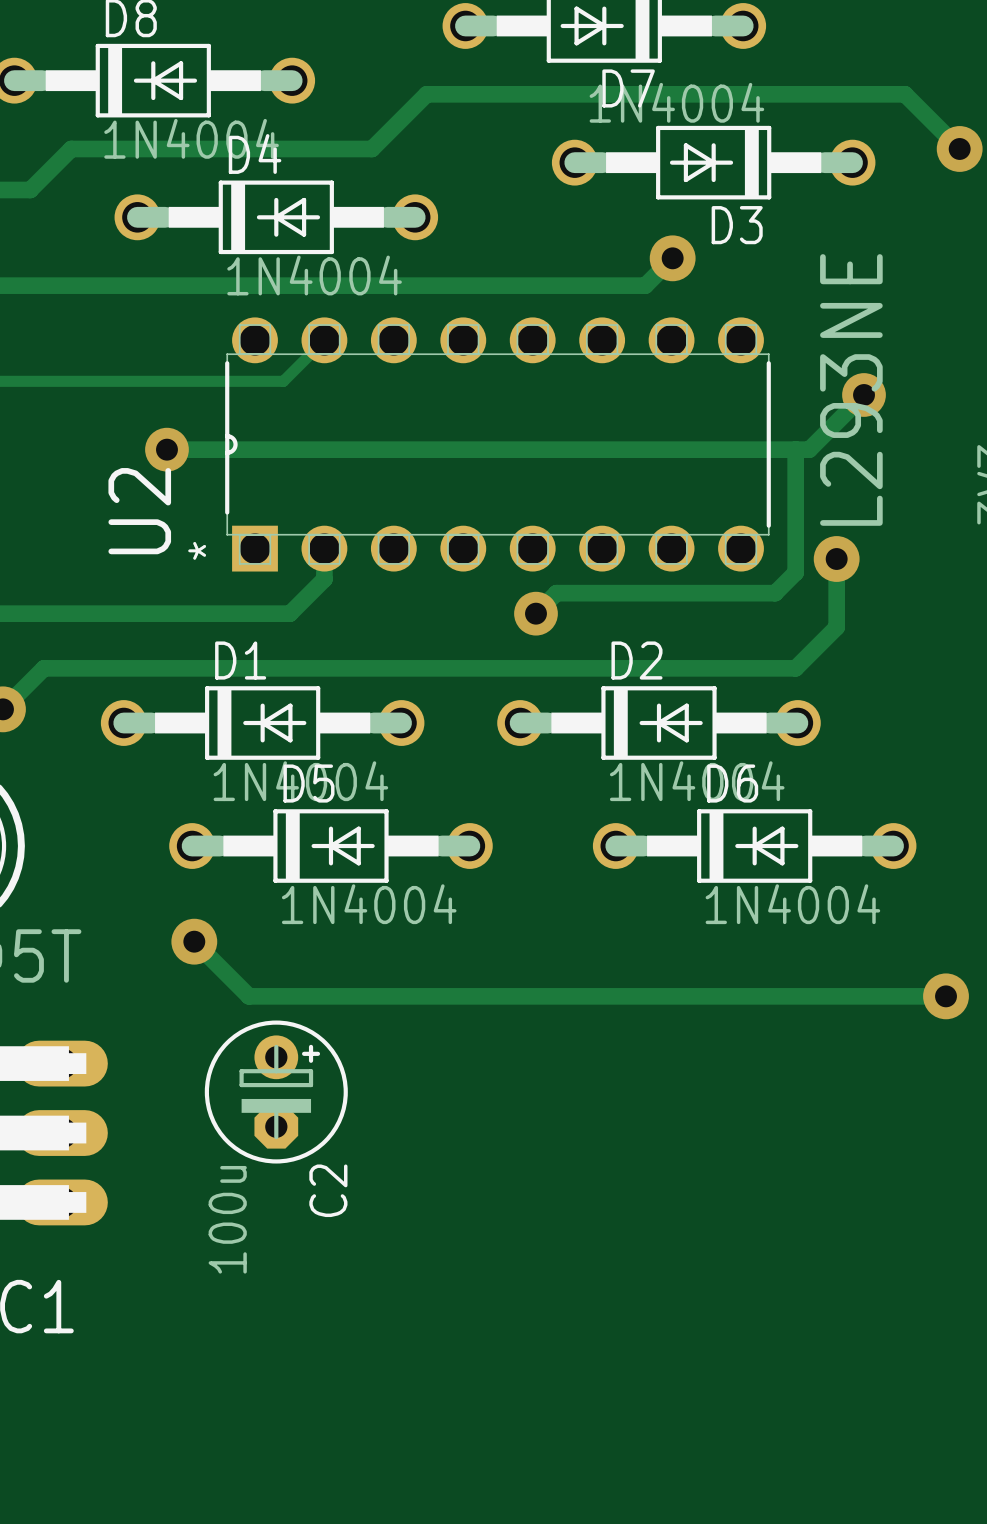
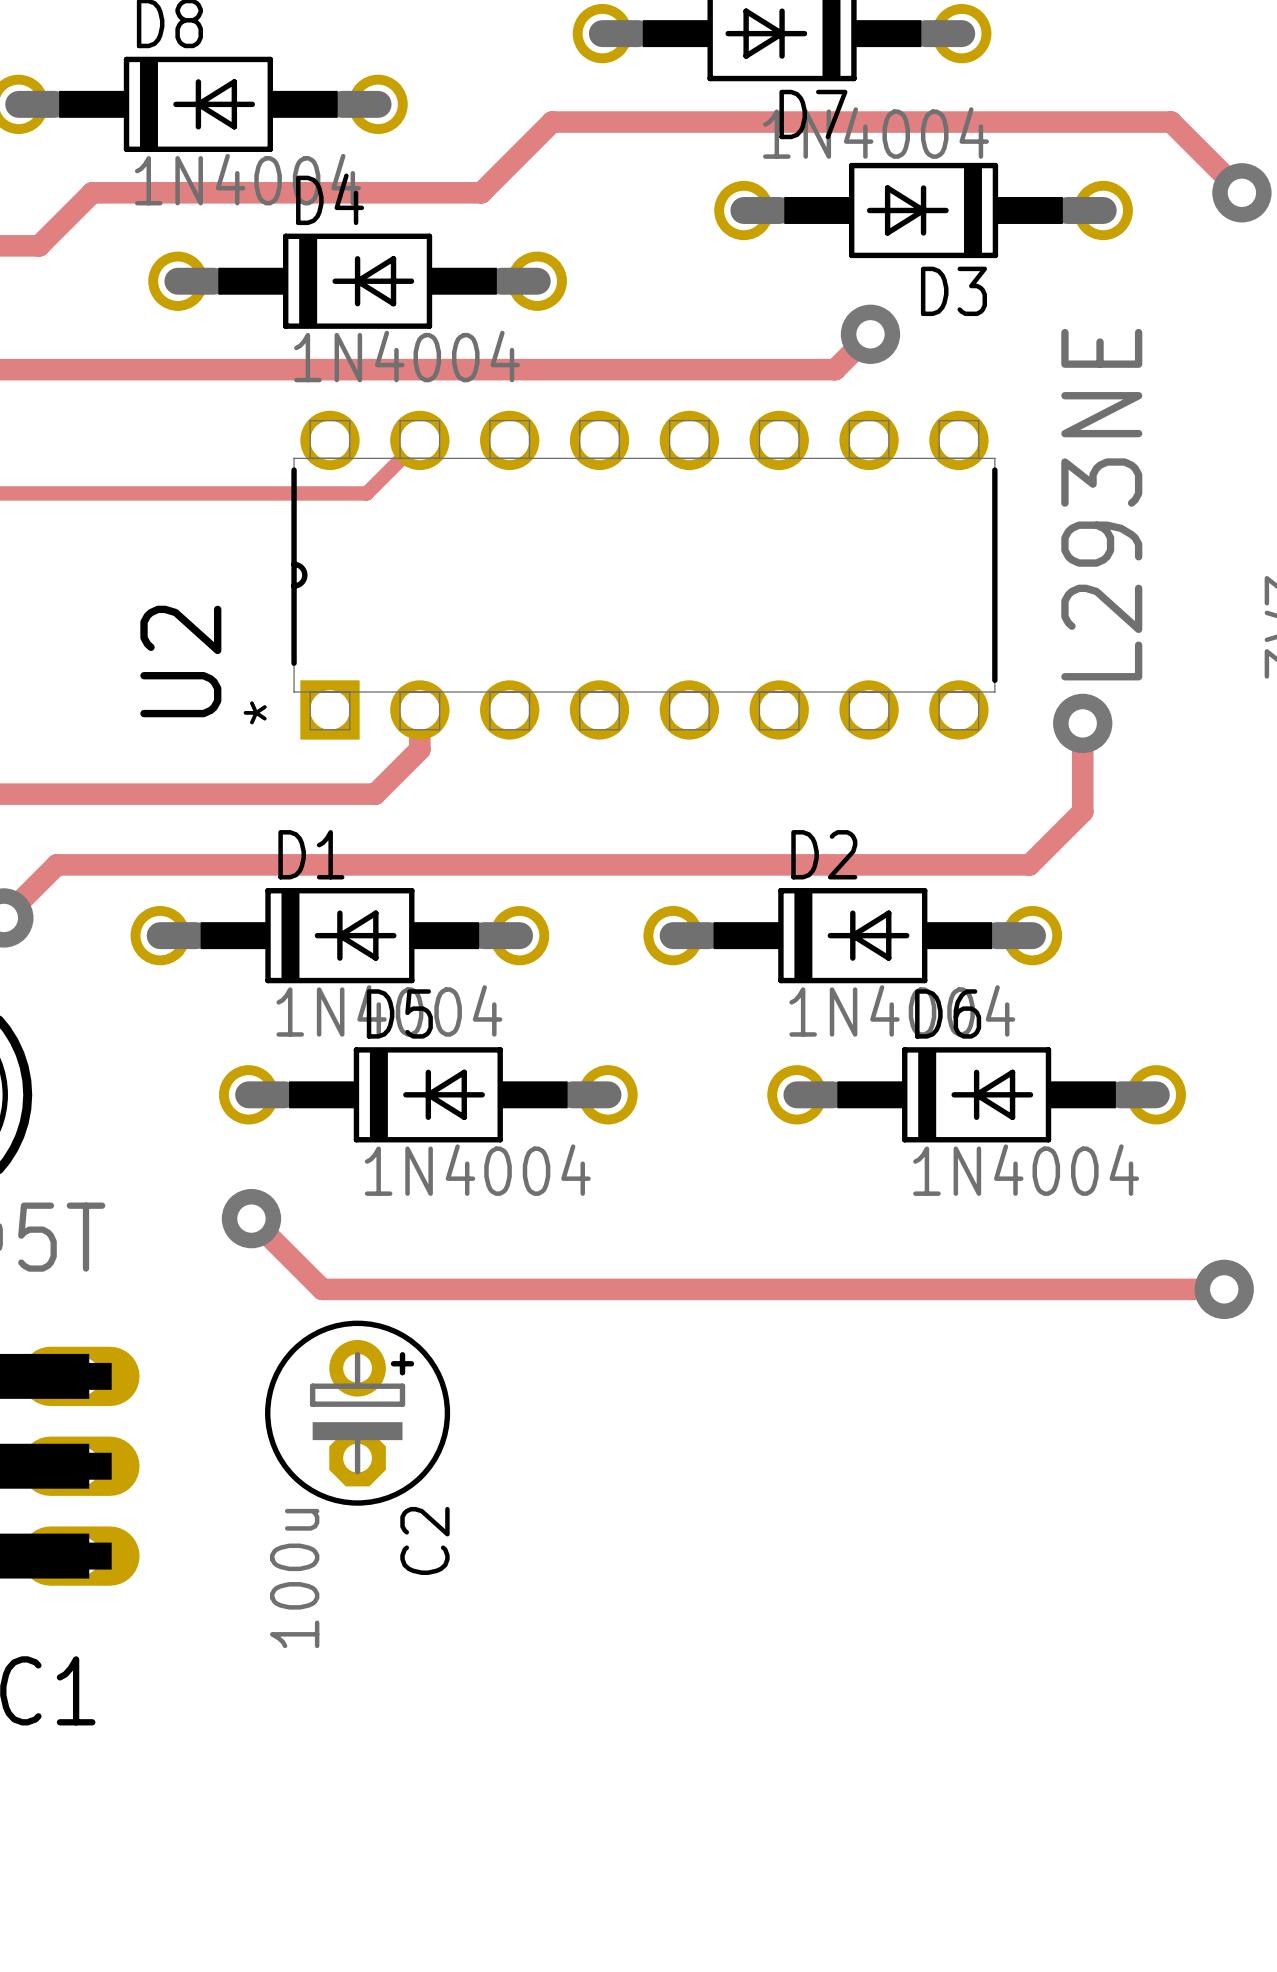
track: (864, 394) (809, 449) (166, 449) -> none
via: (864, 394) -> none
via: (166, 449) -> none
track: (795, 449) (795, 572) (775, 593) (556, 593) (535, 613) -> none
via: (535, 613) -> none

